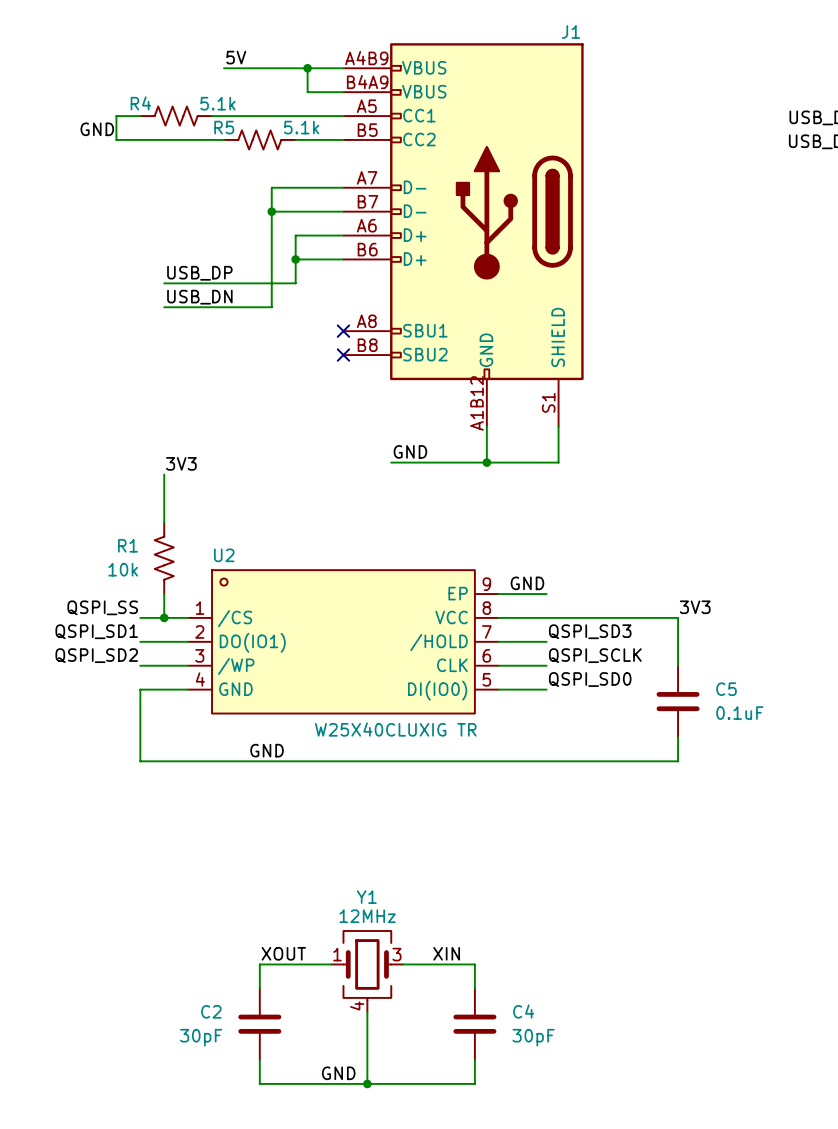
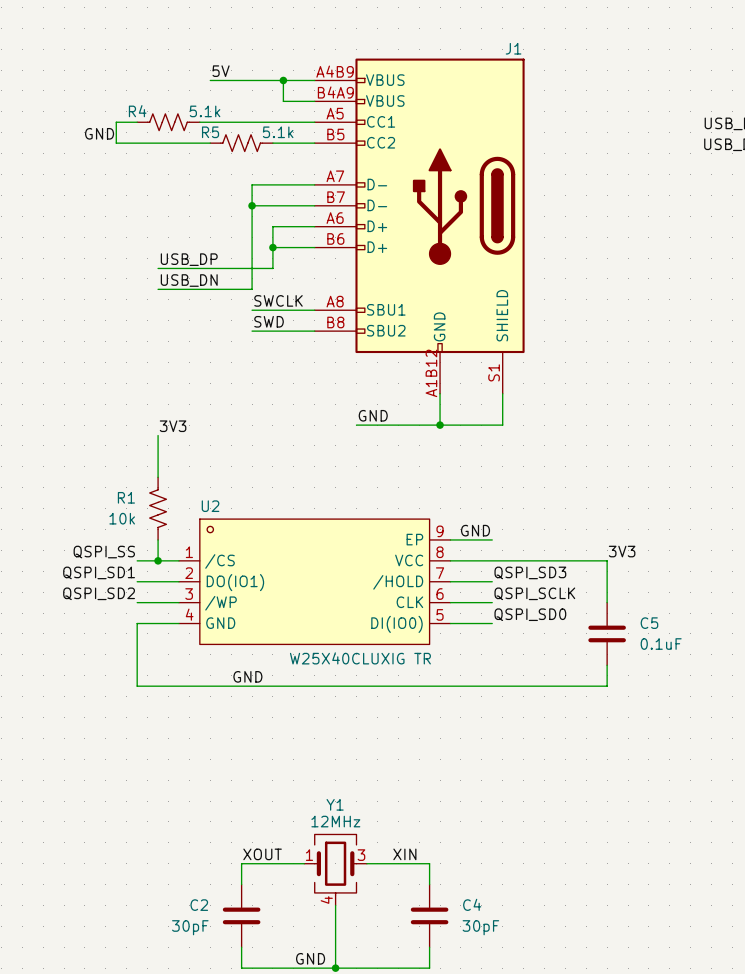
label: none -> SWCLK (278, 300)
wire: none -> (252, 310) (314, 310)
no-connect mark: (343, 331) -> none
label: none -> SWD (269, 321)
wire: none -> (252, 331) (314, 331)
no-connect mark: (343, 355) -> none

